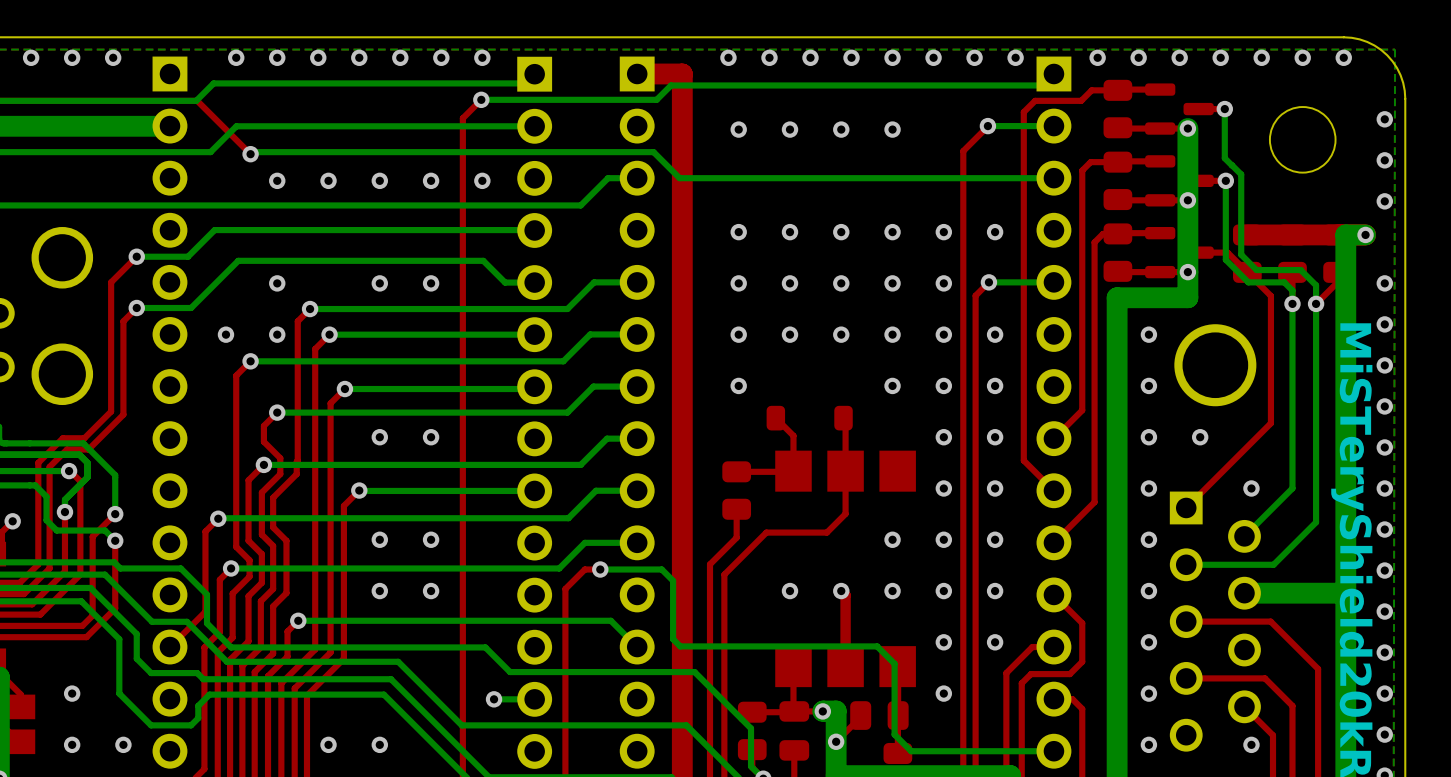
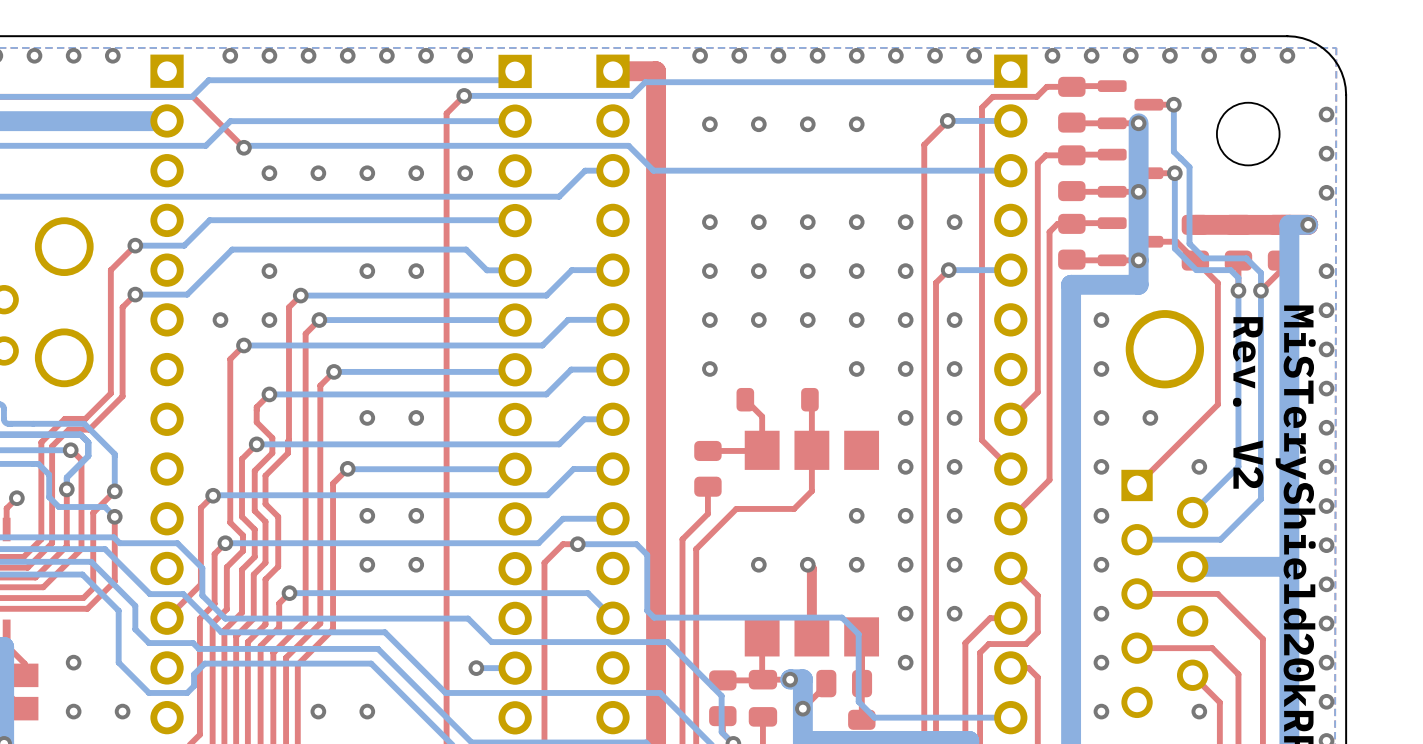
text: none -> Rev. V2 (1248, 402)

